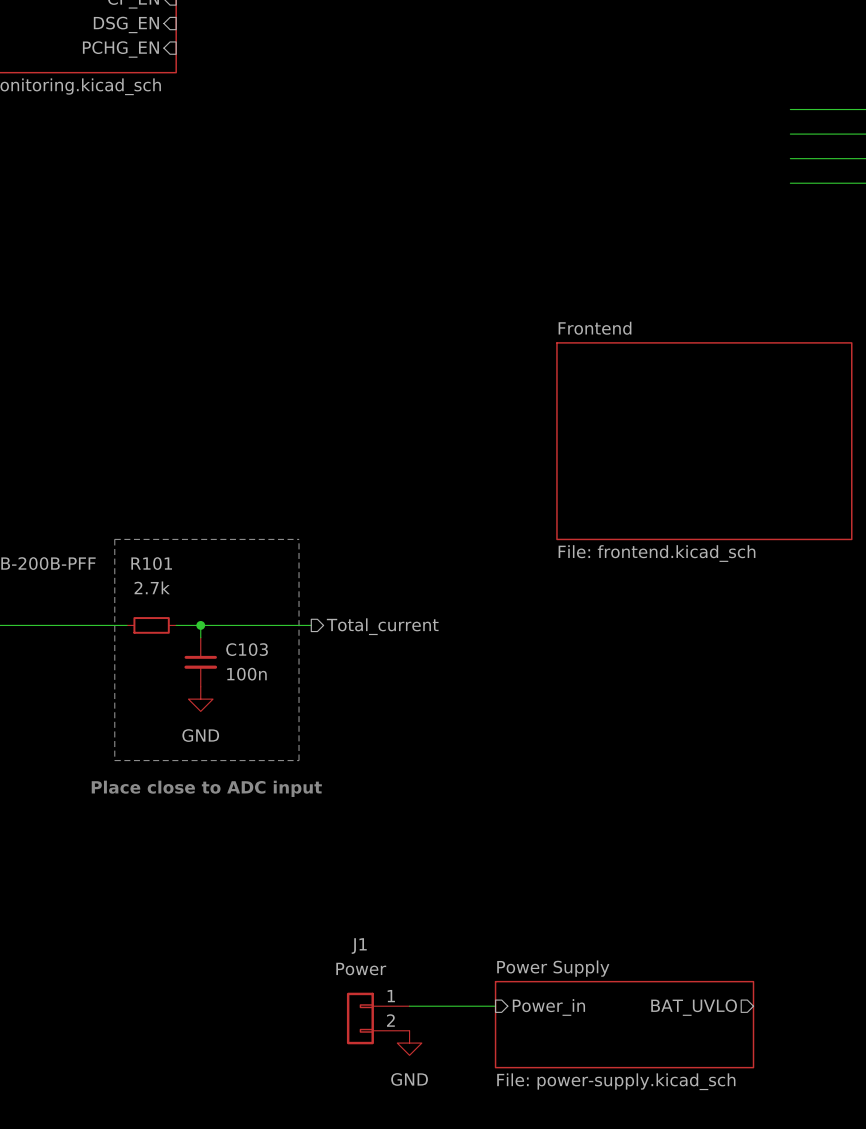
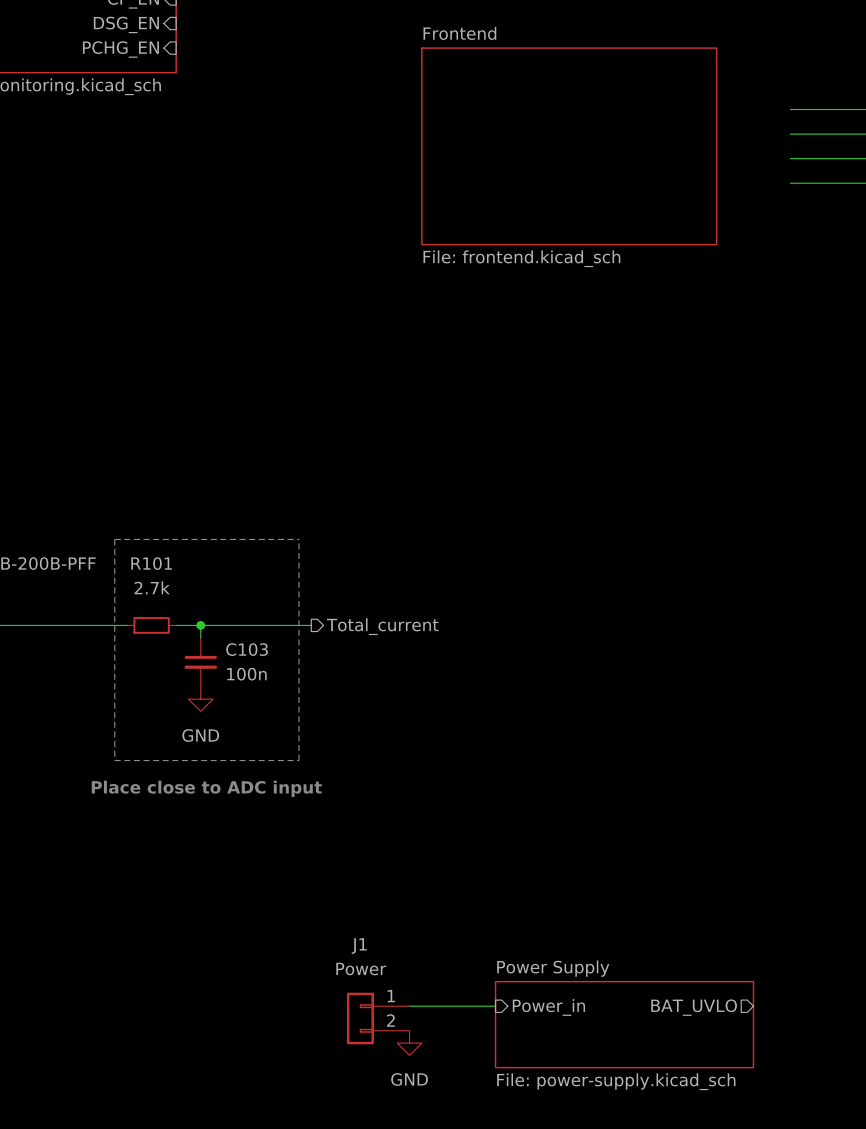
sheet Frontend: none -> File: frontend.kicad_sch (569, 146)
sheet Frontend: File: frontend.kicad_sch (704, 441) -> none

